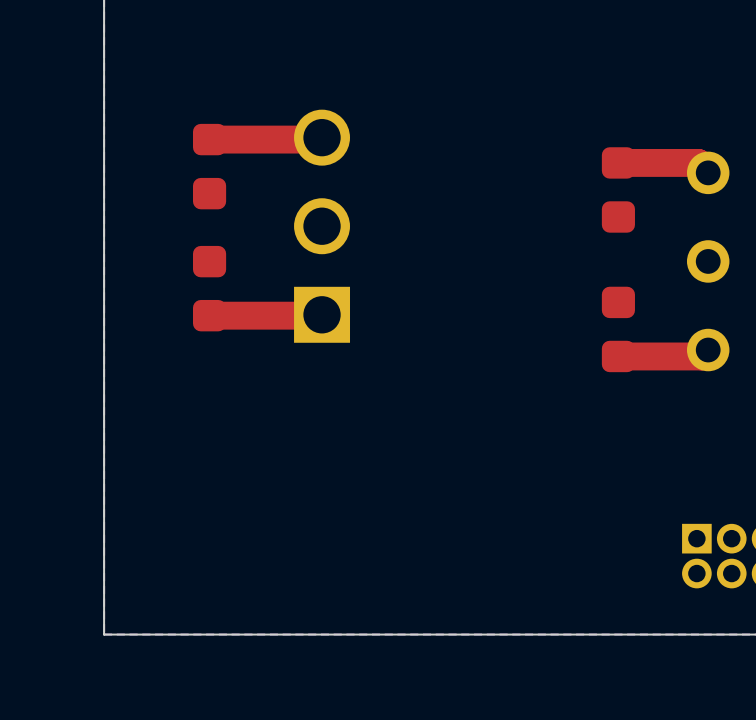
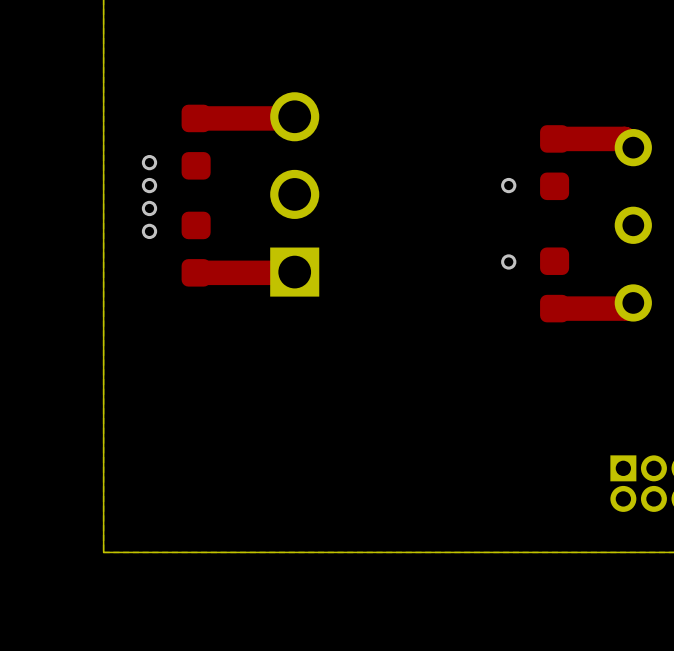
via: none -> (149, 162)
via: none -> (149, 185)
via: none -> (508, 185)
via: none -> (149, 208)
via: none -> (149, 231)
via: none -> (508, 261)

